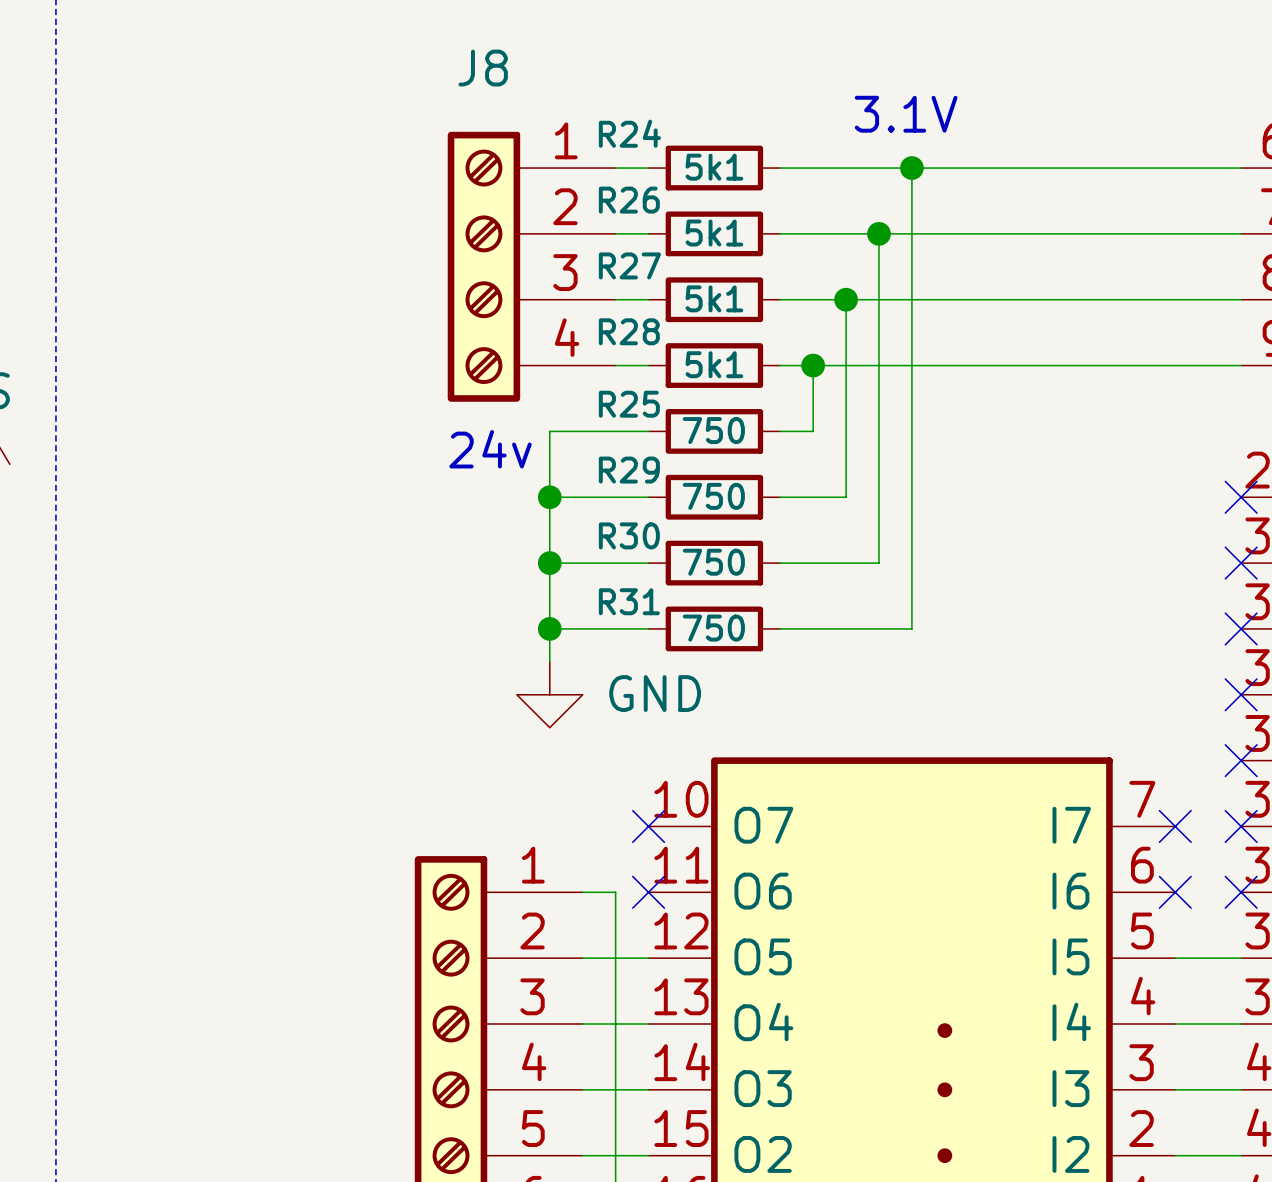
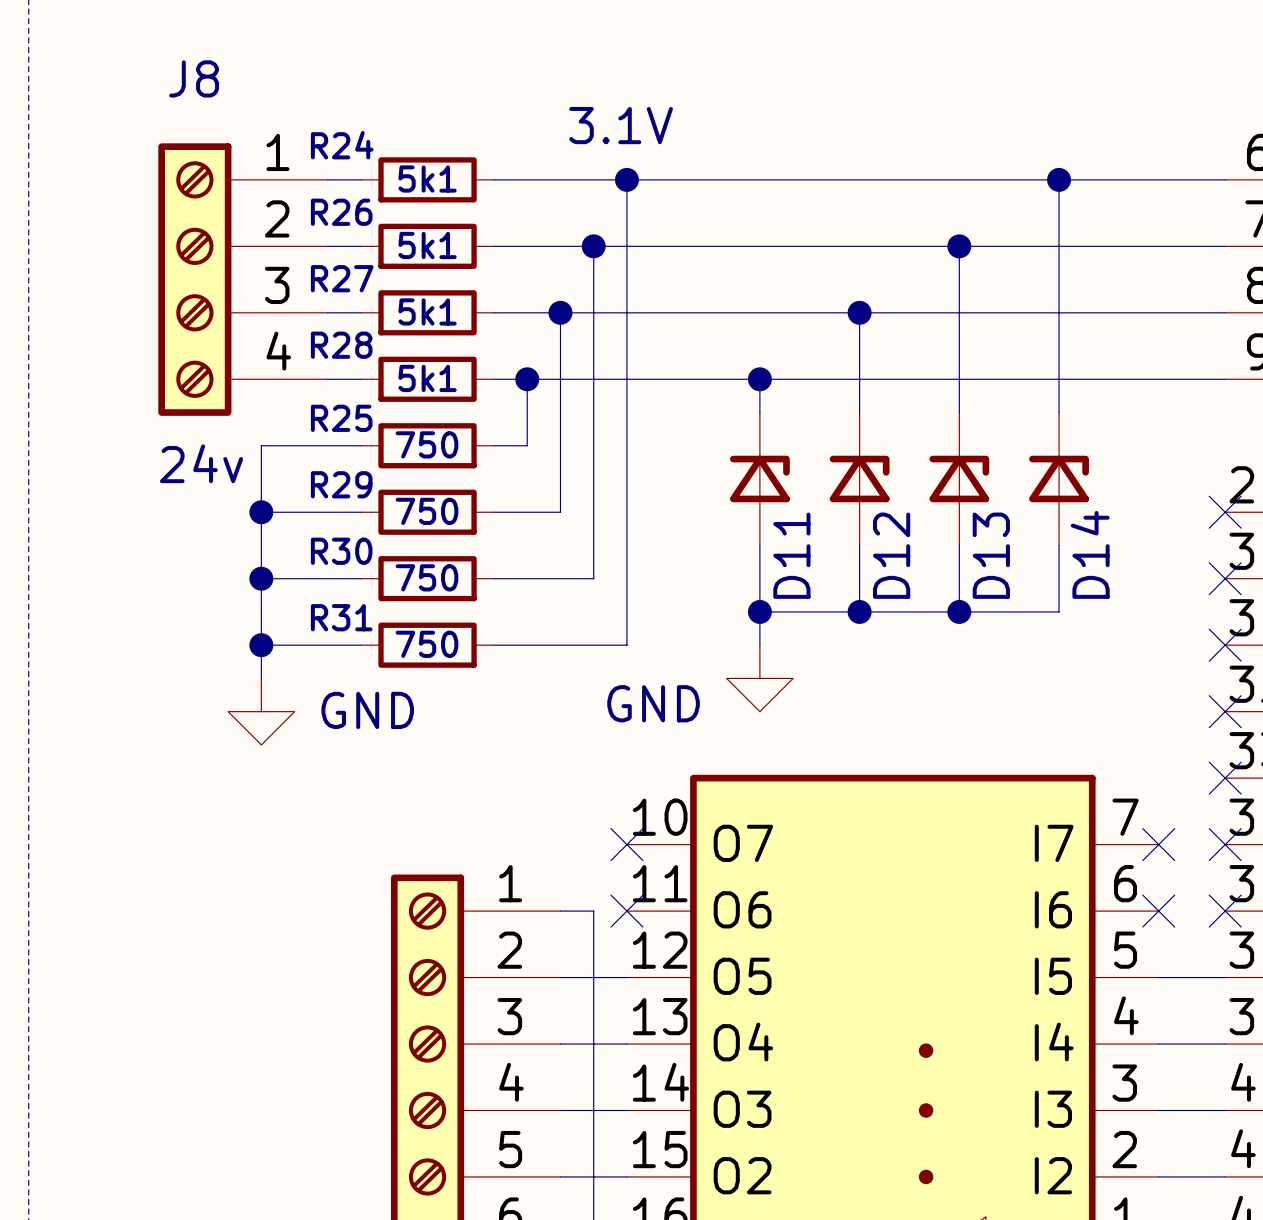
text position: 3.1V (906, 114) -> 3.1V (621, 125)
wire: none -> (327, 179) (361, 179)
junction: none -> (626, 179)
R24 position: (714, 168) -> (427, 179)
wire: none -> (759, 179) (626, 179) (626, 645)
wire: (911, 168) (911, 628) (780, 628) -> (759, 545) (759, 645)
junction: (911, 168) -> none
wire: none -> (1059, 179) (1059, 412)
junction: none -> (1059, 179)
wire: none -> (327, 246) (361, 246)
junction: none -> (593, 246)
wire: none -> (626, 246) (759, 246)
R26 position: (714, 233) -> (427, 246)
wire: (879, 233) (879, 299) -> (959, 545) (959, 611)
junction: (879, 233) -> none
wire: none -> (959, 246) (959, 412)
junction: none -> (959, 246)
J8 position: (531, 266) -> (243, 279)
wire: none -> (327, 312) (361, 312)
junction: none -> (560, 312)
wire: none -> (626, 312) (759, 312)
R27 position: (714, 299) -> (427, 312)
wire: (846, 299) (846, 497) (780, 497) -> none
junction: (846, 299) -> none
junction: none -> (859, 312)
wire: none -> (327, 379) (361, 379)
junction: none -> (527, 379)
wire: none -> (626, 379) (759, 379) (759, 412)
R28 position: (714, 365) -> (427, 379)
wire: (813, 365) (813, 431) (780, 431) -> (527, 379) (527, 445) (494, 445)
junction position: (813, 365) -> (759, 379)
wire: (648, 431) (549, 431) (549, 661) -> (361, 445) (261, 445) (261, 678)
R25 position: (714, 431) -> (427, 445)
text position: 24v (490, 449) -> 24v (201, 463)
D11: none -> (759, 479)
D12: none -> (859, 479)
D13: none -> (959, 479)
D14: none -> (1059, 479)
wire: none -> (261, 512) (361, 512)
junction: none -> (261, 512)
wire: none -> (494, 512) (527, 512)
junction: (549, 497) -> none
wire: (582, 497) (648, 497) -> (560, 512) (560, 312)
R29 position: (714, 497) -> (427, 512)
wire: none -> (1059, 545) (1059, 611) (759, 611)
wire: none -> (261, 578) (361, 578)
junction: none -> (261, 578)
wire: none -> (494, 578) (527, 578)
junction: (549, 563) -> none
wire: (615, 563) (648, 563) -> (593, 578) (593, 246) (494, 246)
R30 position: (714, 563) -> (427, 578)
wire: (780, 563) (879, 563) -> (859, 611) (859, 578)
junction: none -> (759, 611)
junction: none -> (859, 611)
junction: none -> (959, 611)
wire: none -> (261, 645) (361, 645)
junction: none -> (261, 645)
wire: none -> (494, 645) (527, 645)
junction: (549, 628) -> none
R31 position: (714, 628) -> (427, 645)
power symbol: none -> GND (759, 678)
power symbol: none -> GND (261, 711)
power symbol: GND (549, 694) -> none

